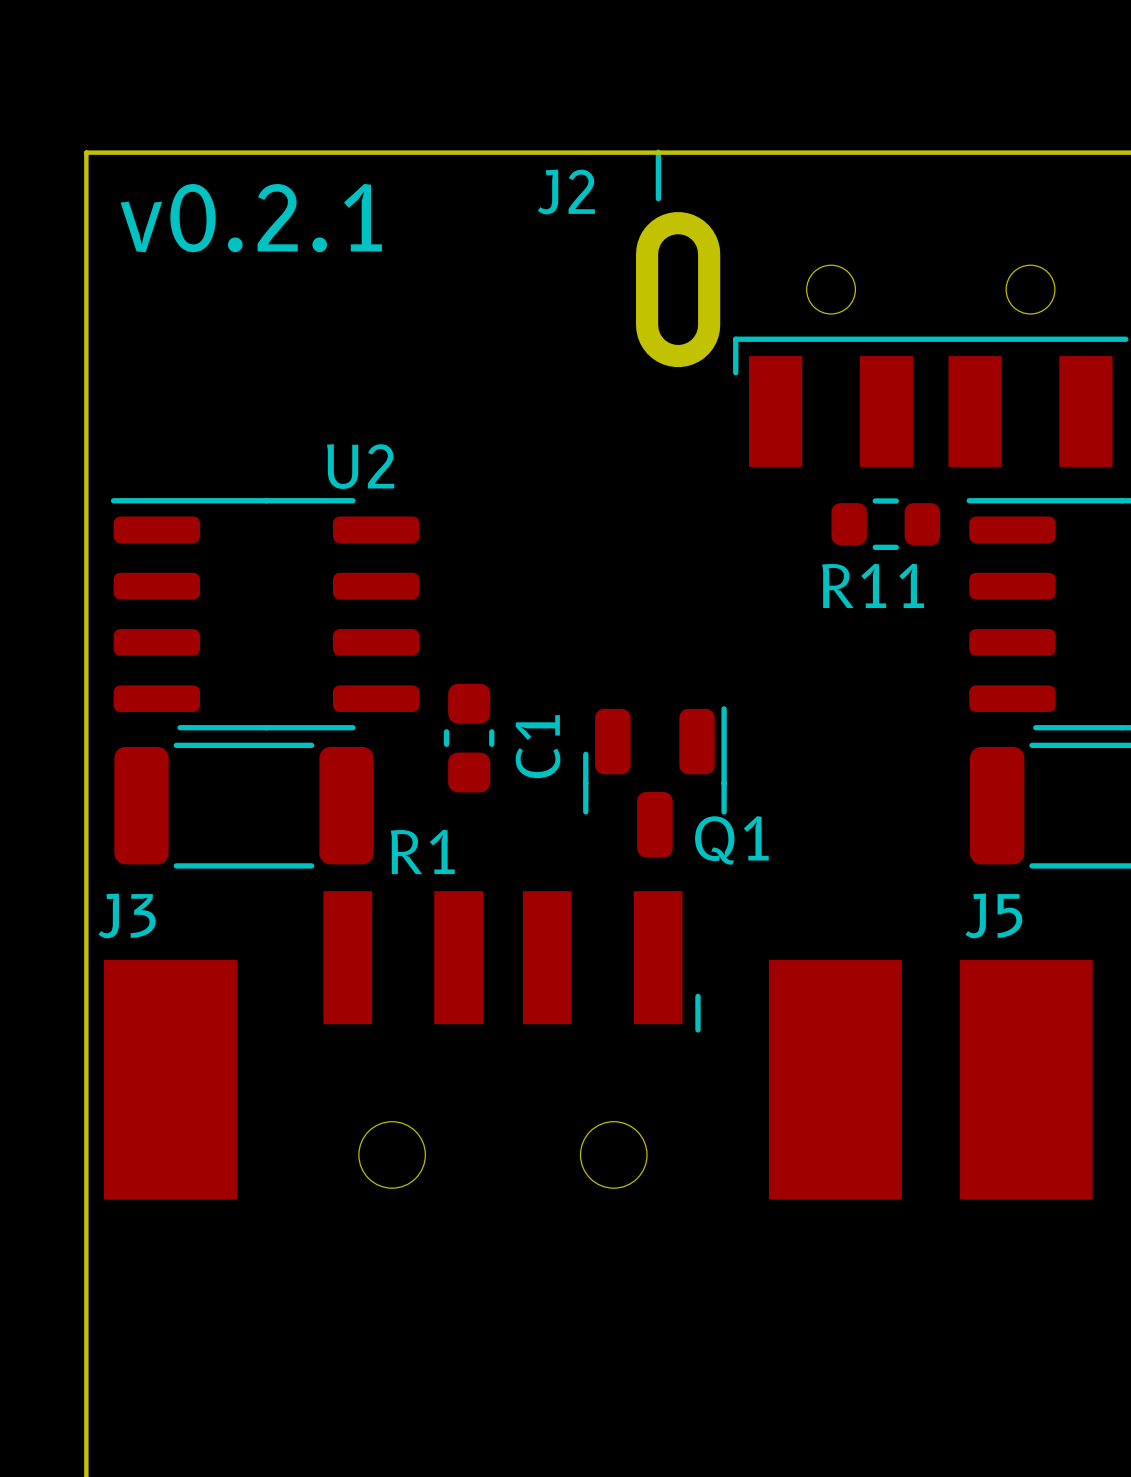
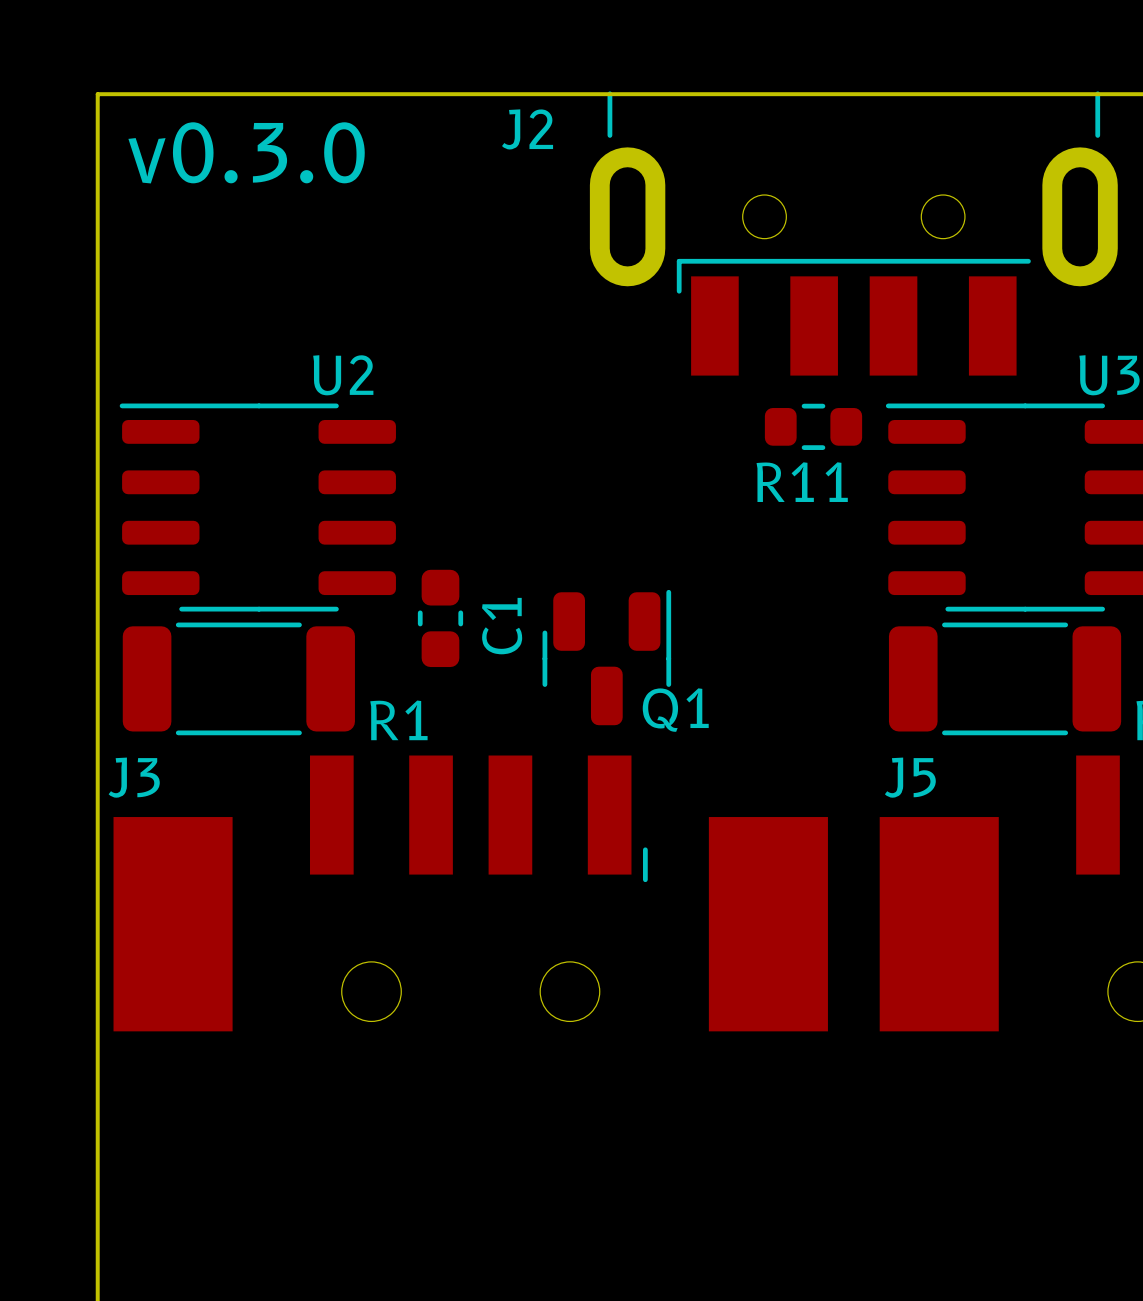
text: v0.2.1 (251, 218) -> v0.3.0 (246, 152)

